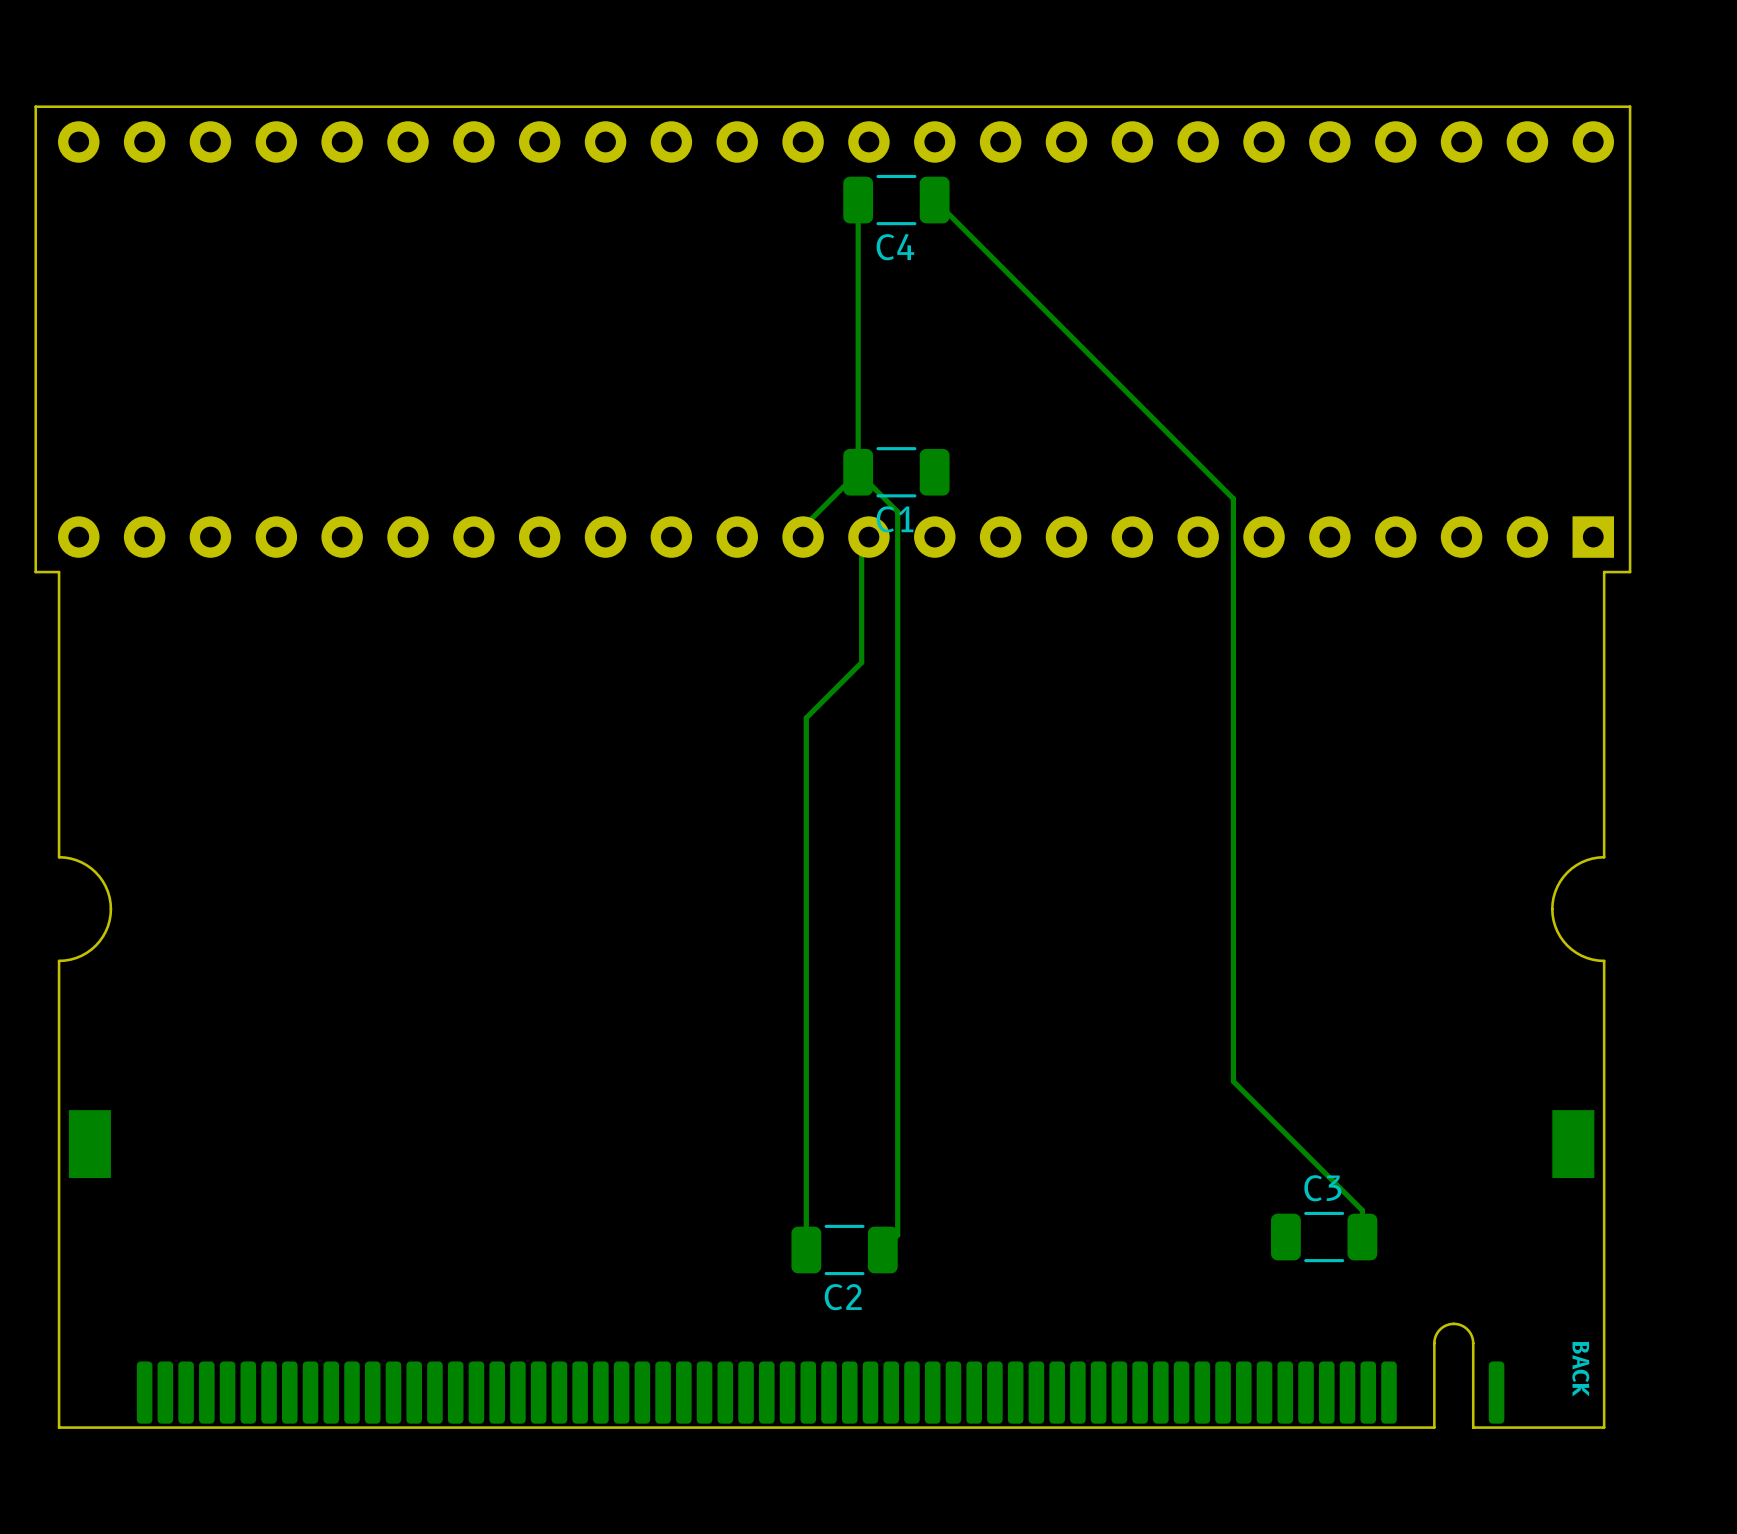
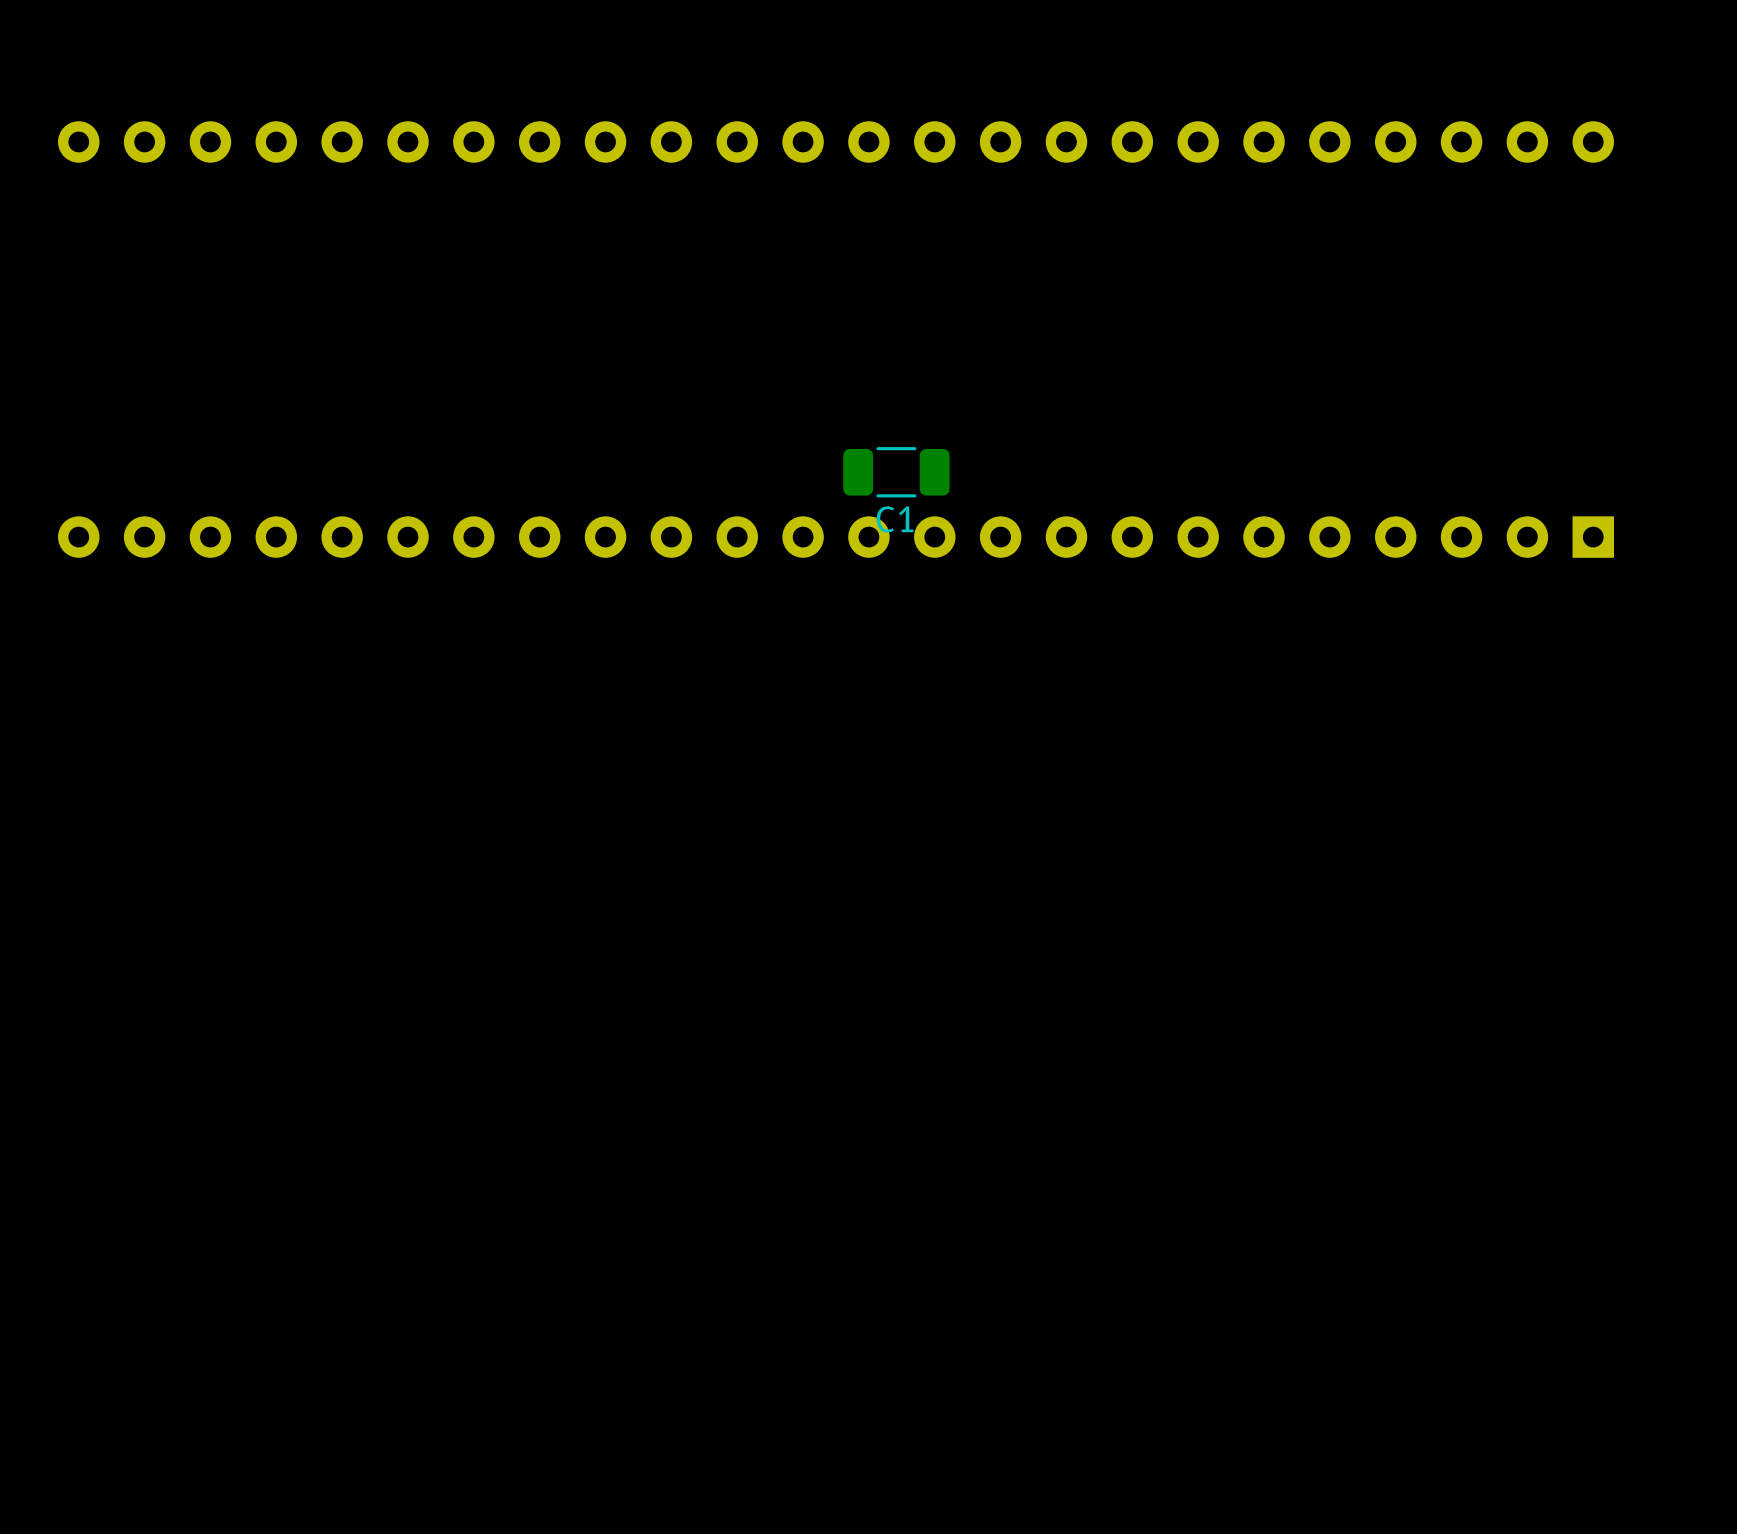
track: (858, 200) (858, 472) -> none
C4: (896, 200) -> none
track: (934, 200) (1233, 498) (1233, 1081) (1362, 1210) (1362, 1237) -> none
track: (858, 472) (803, 527) (803, 537) -> none
track: (858, 472) (897, 511) (897, 1235) (882, 1249) -> none
track: (861, 537) (861, 662) (806, 717) (806, 1249) -> none
part: (832, 767) -> none
C3: (1324, 1237) -> none
C2: (844, 1249) -> none
text: BACK (1580, 1369) -> none

